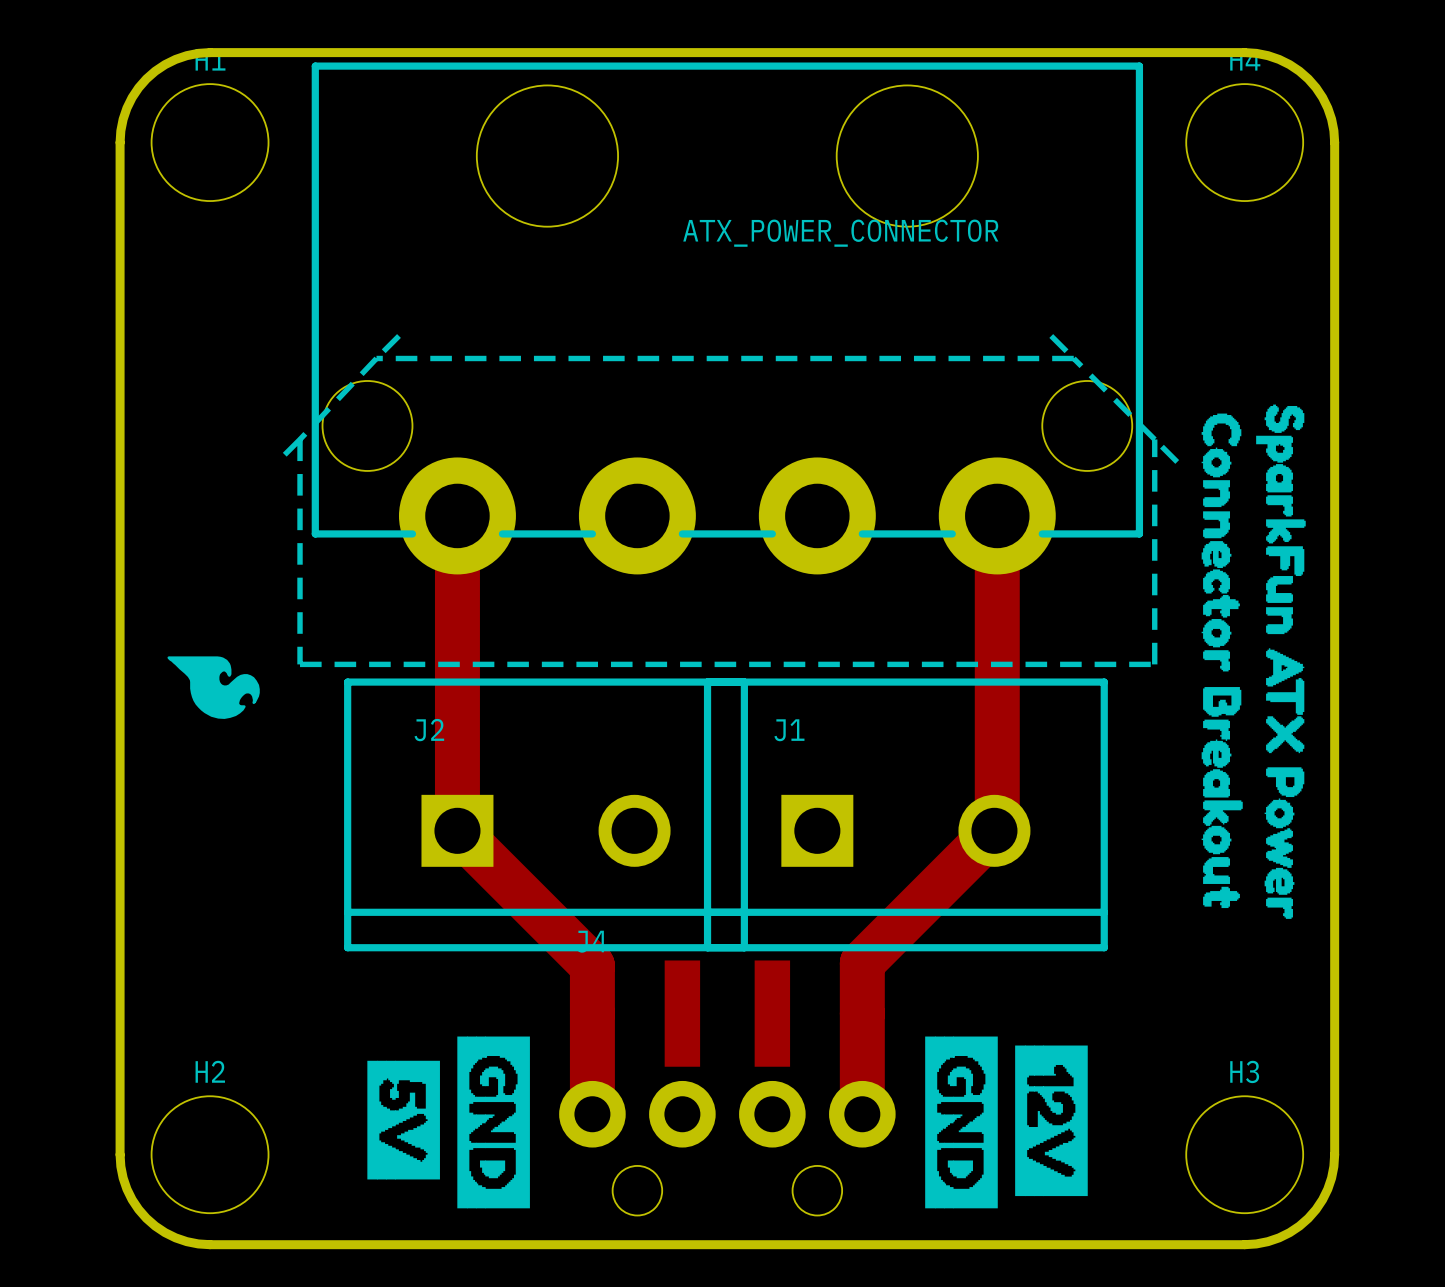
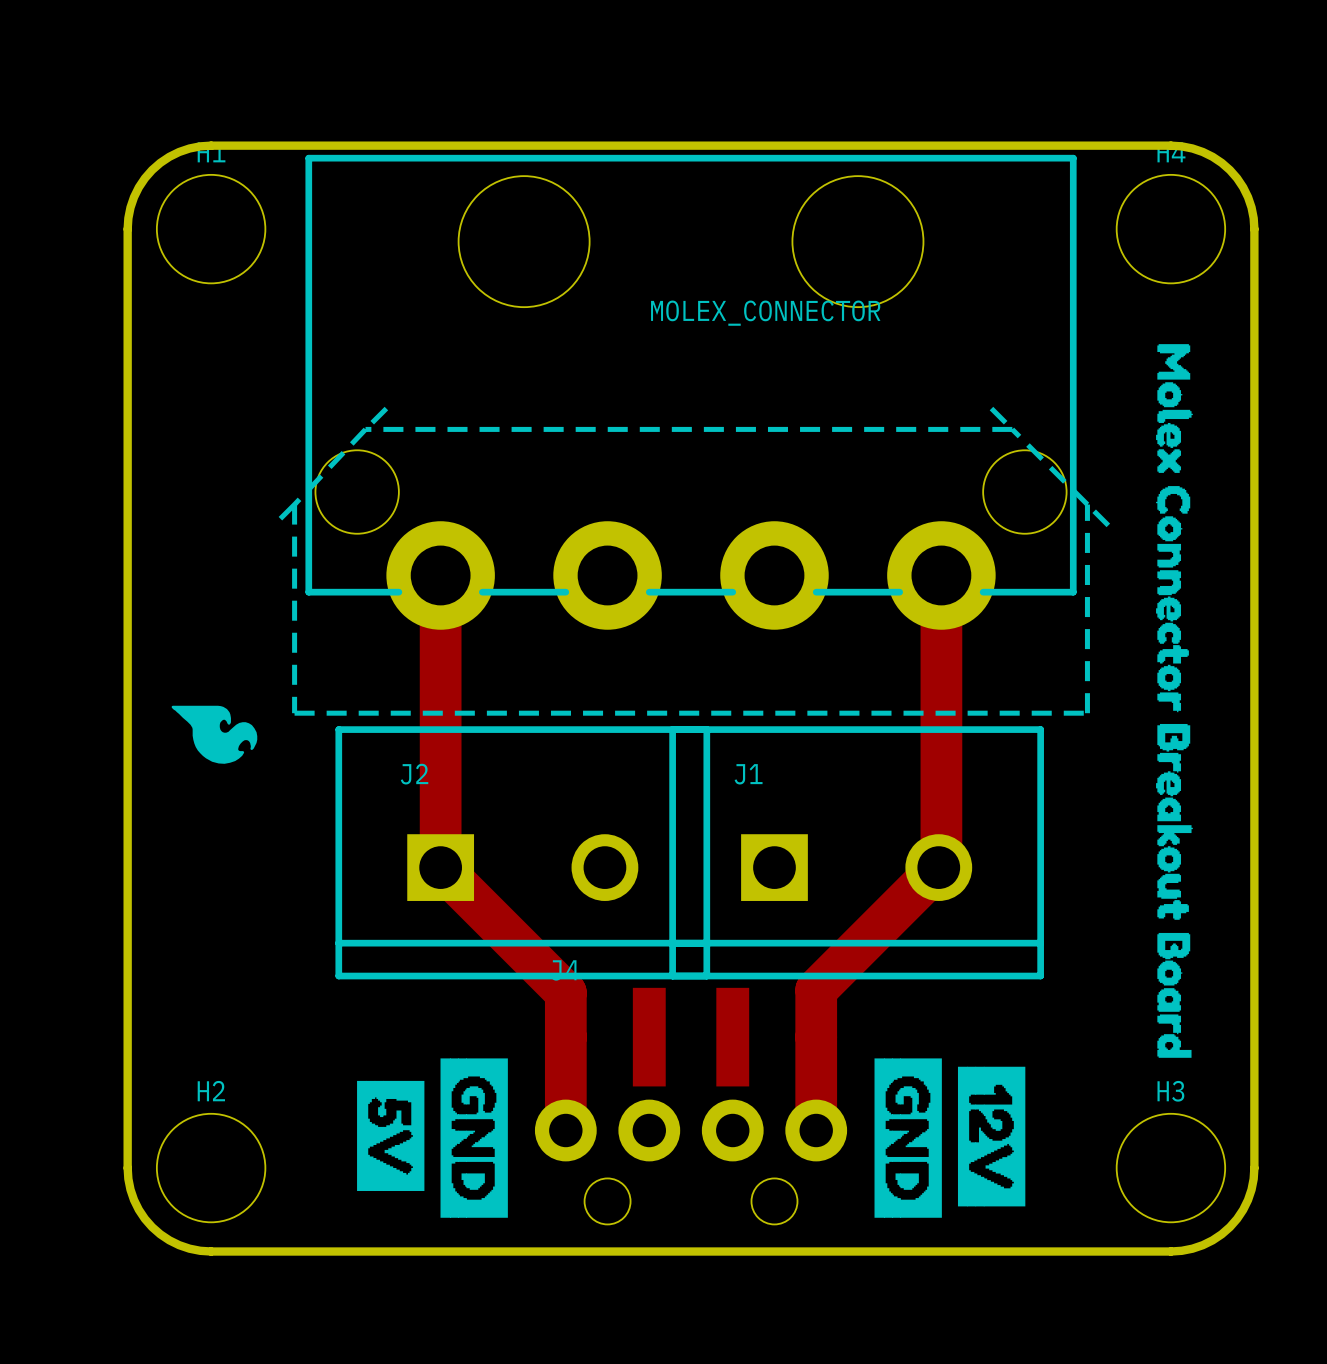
ATX_POWER_CONNECTOR name: ATX_POWER_CONNECTOR (840, 233) -> MOLEX_CONNECTOR (765, 313)
drawing: none -> [1156, 344, 1193, 1058]
drawing: [1201, 404, 1306, 919] -> none

